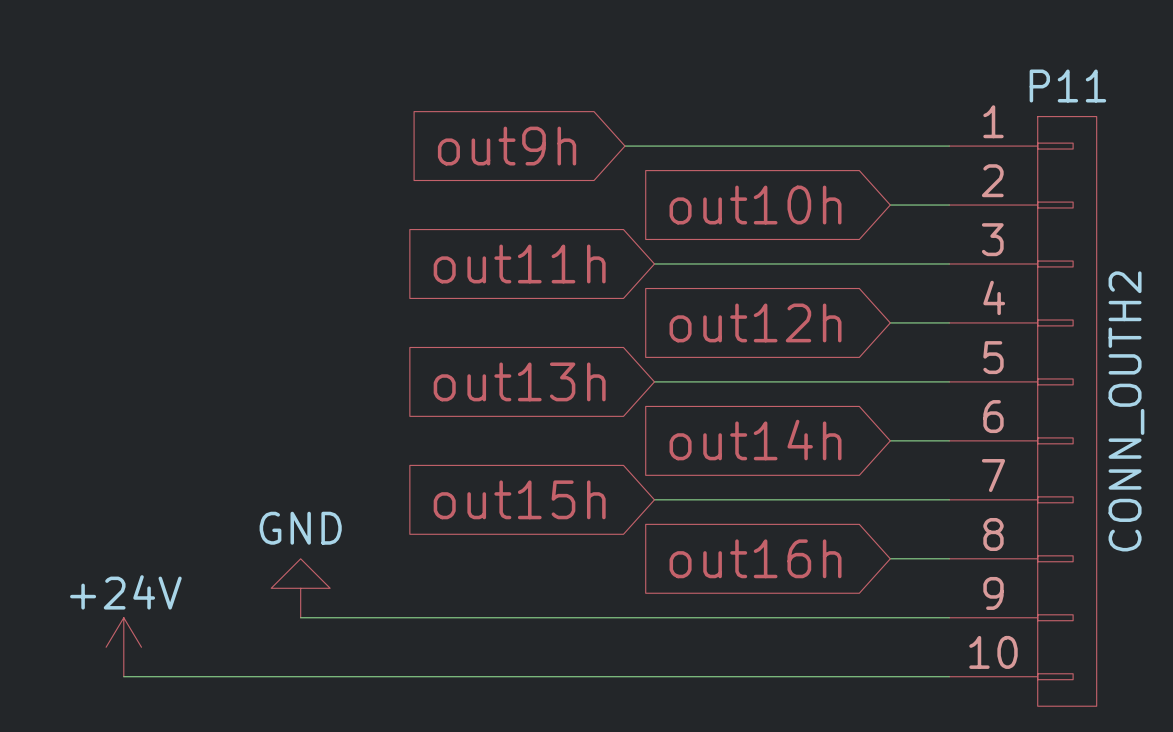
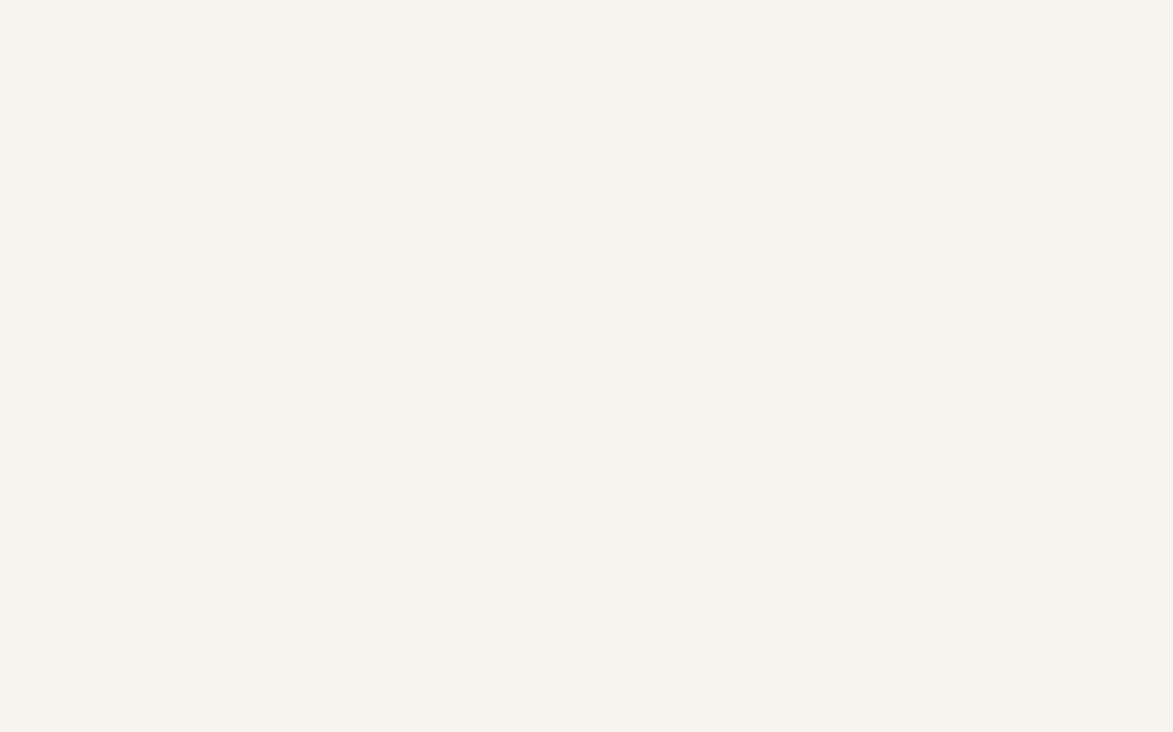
global label: out9h (507, 146) -> none
wire: (624, 146) (949, 146) -> none
global label: out10h (755, 205) -> none
wire: (890, 205) (949, 205) -> none
global label: out11h (519, 263) -> none
wire: (654, 263) (949, 263) -> none
global label: out12h (755, 322) -> none
wire: (890, 322) (949, 322) -> none
global label: out13h (519, 381) -> none
wire: (654, 381) (949, 381) -> none
P11: CONN_OUTH2 (1022, 411) -> none
global label: out14h (755, 440) -> none
wire: (890, 440) (949, 440) -> none
global label: out15h (519, 499) -> none
wire: (654, 499) (949, 499) -> none
global label: out16h (755, 558) -> none
wire: (890, 558) (949, 558) -> none
power symbol: GND (300, 588) -> none
wire: (300, 617) (949, 617) -> none
power symbol: +24V (123, 647) -> none
wire: (123, 676) (949, 676) -> none

